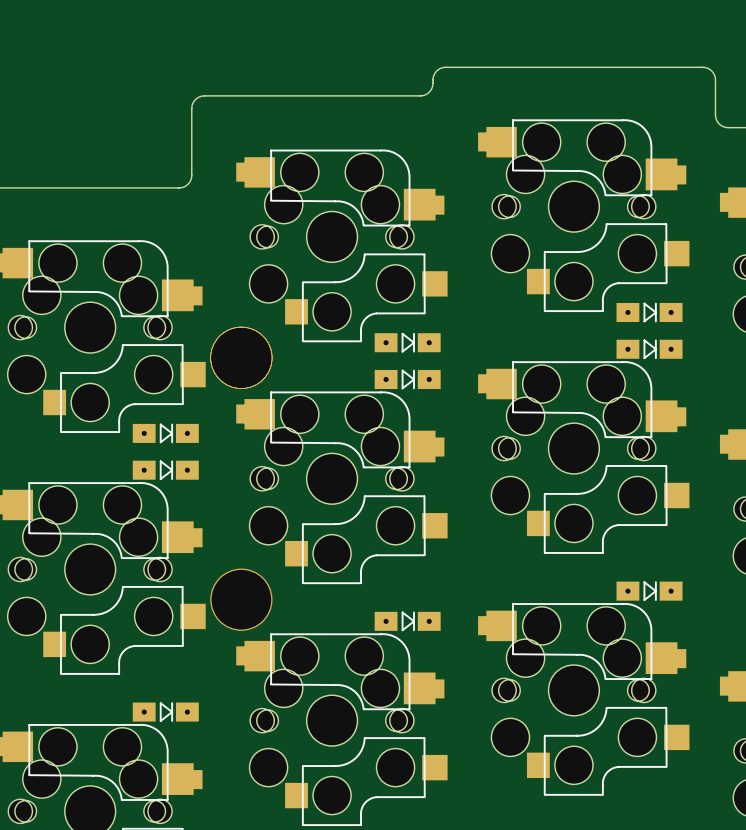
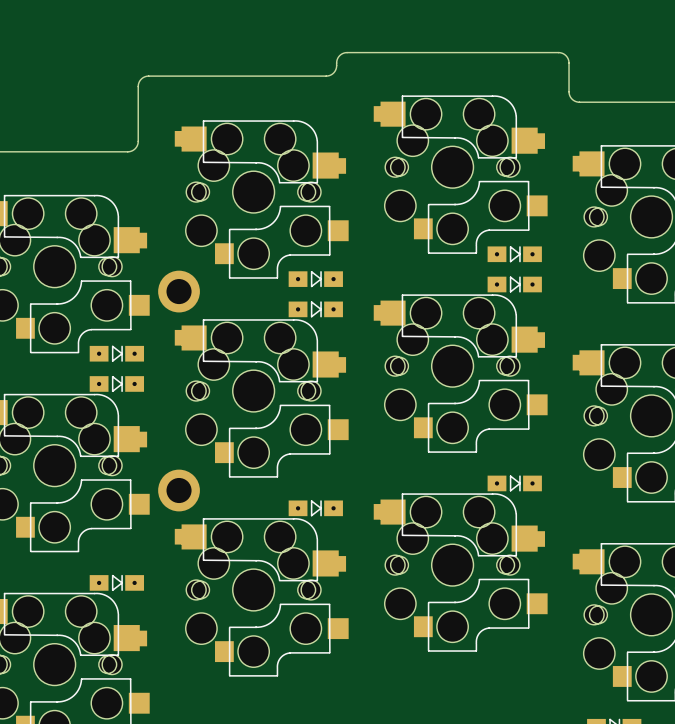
part footprint: [210, 326, 273, 389] -> [158, 270, 200, 313]
part footprint: [210, 568, 273, 631] -> [158, 469, 200, 512]

